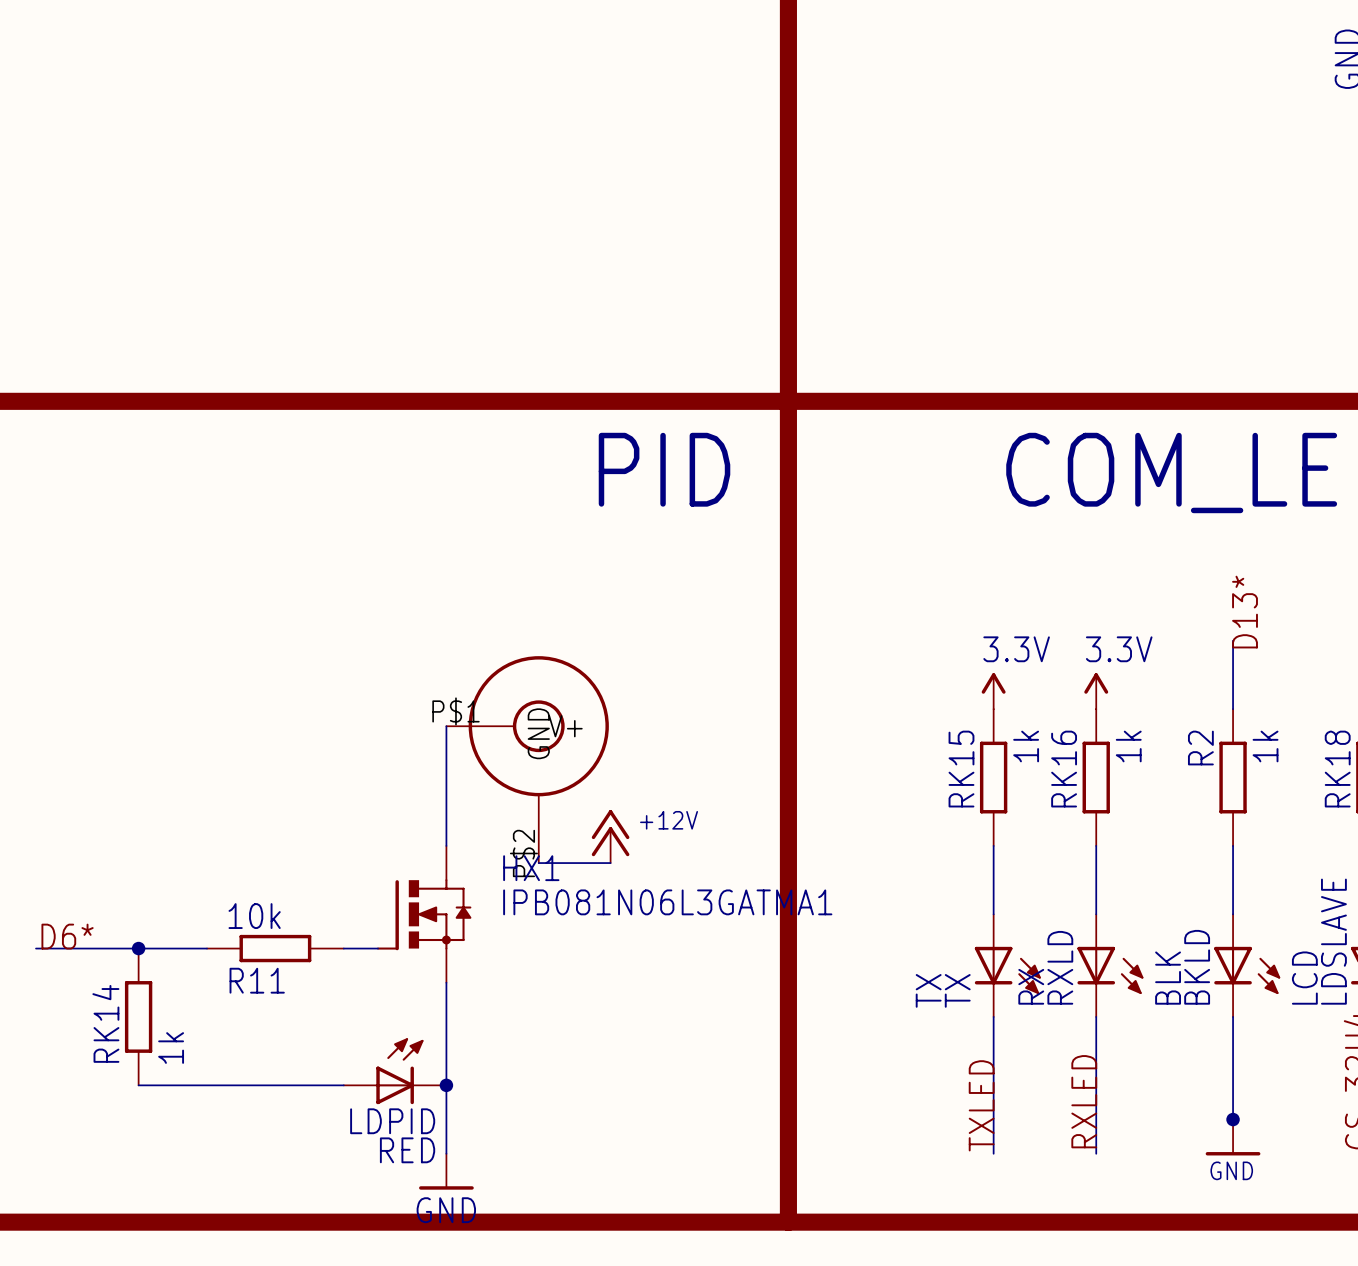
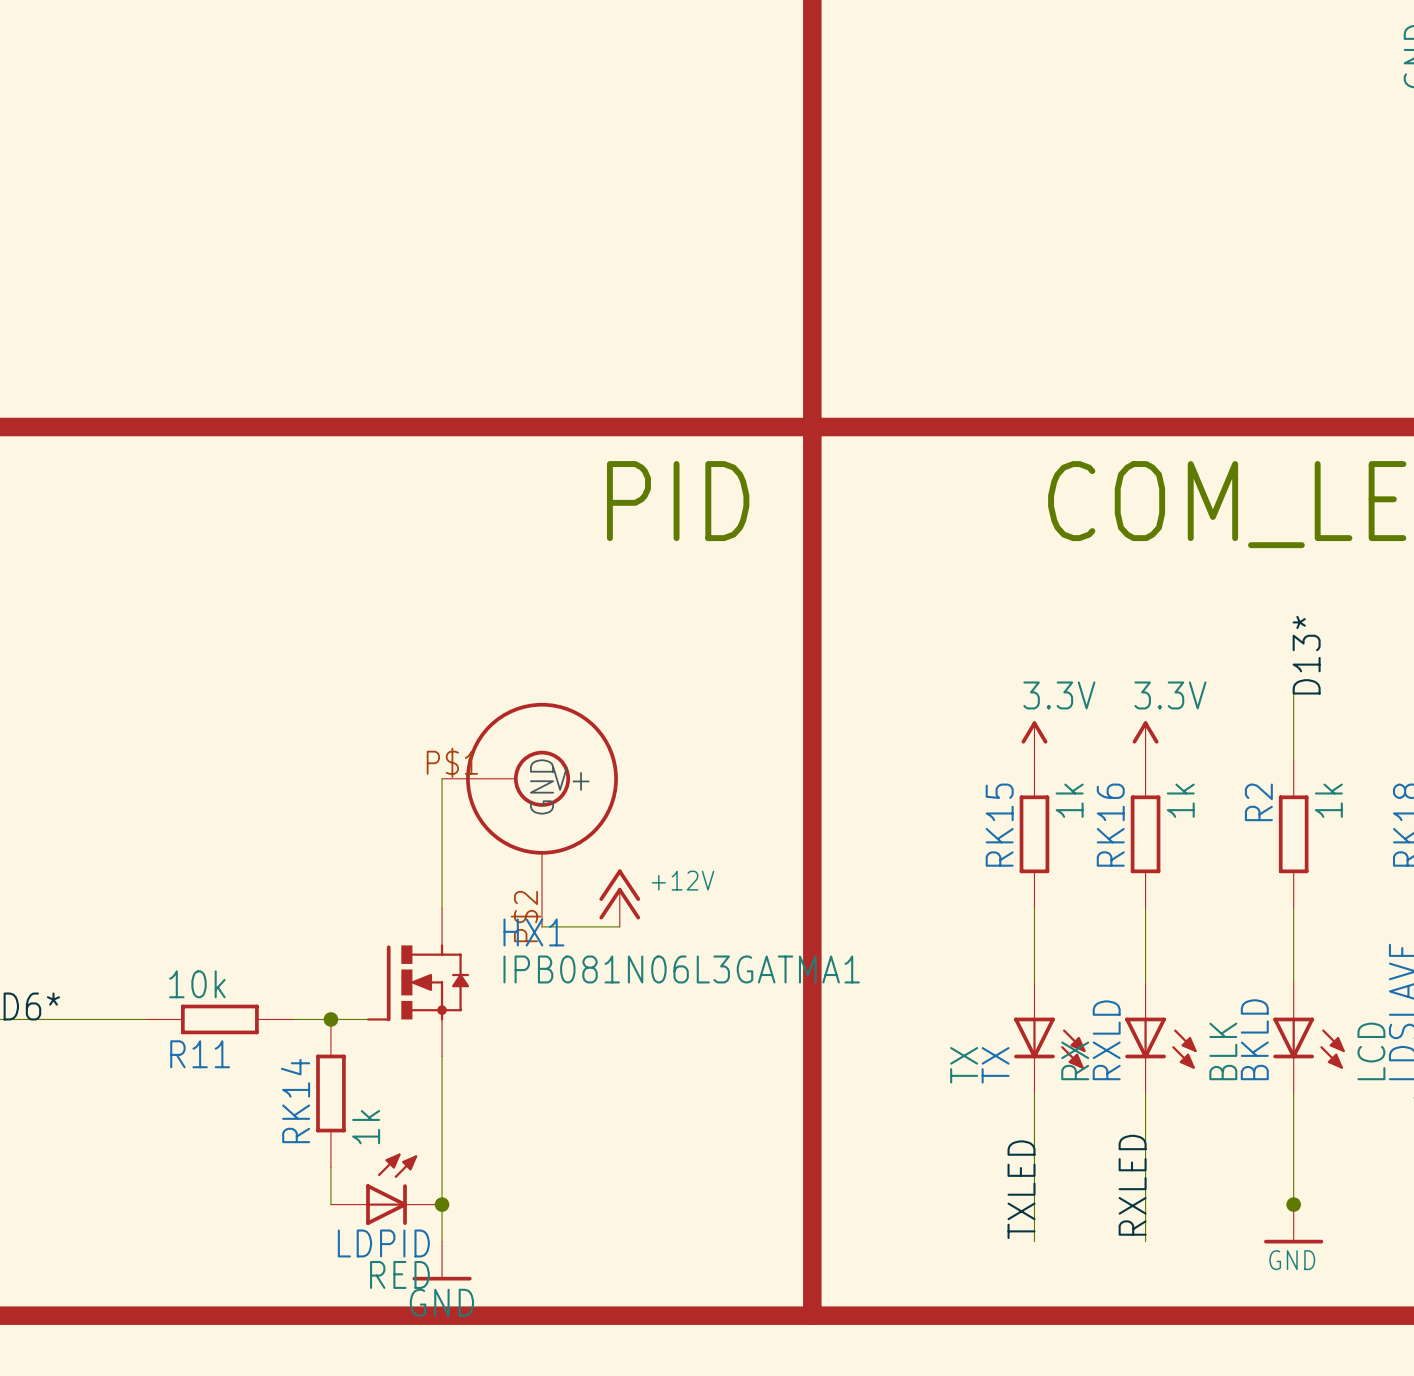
junction: (138, 948) -> none
R11 position: (275, 948) -> (219, 1019)
junction: none -> (330, 1019)
RK14 position: (138, 1016) -> (330, 1093)
LDPID position: (395, 1071) -> (386, 1189)
wire: (138, 1085) (343, 1085) -> (330, 1204) (330, 1167)
junction position: (446, 1085) -> (442, 1204)

